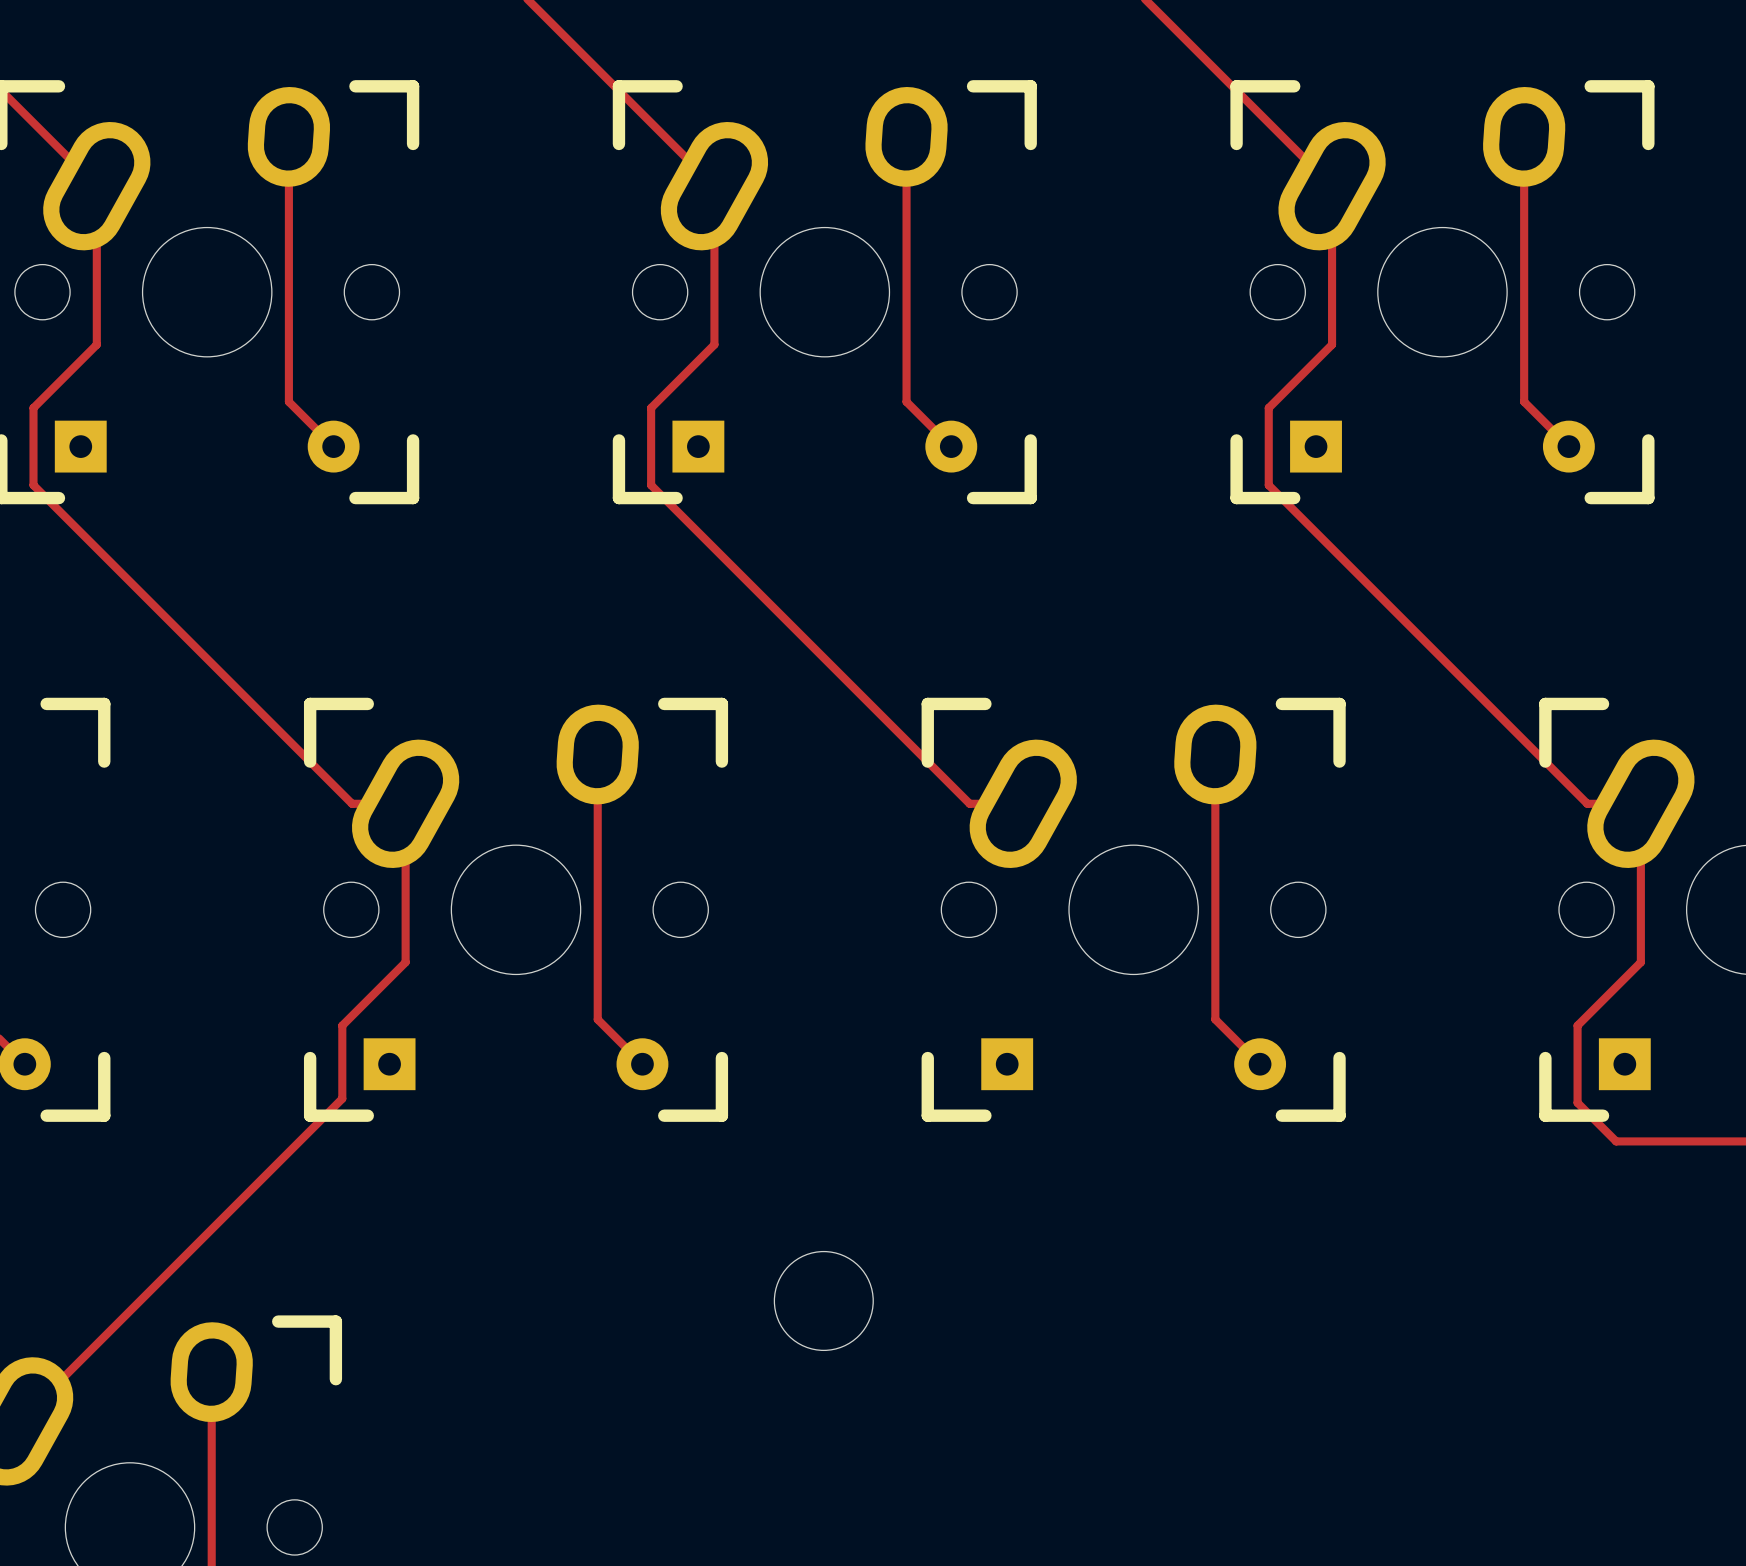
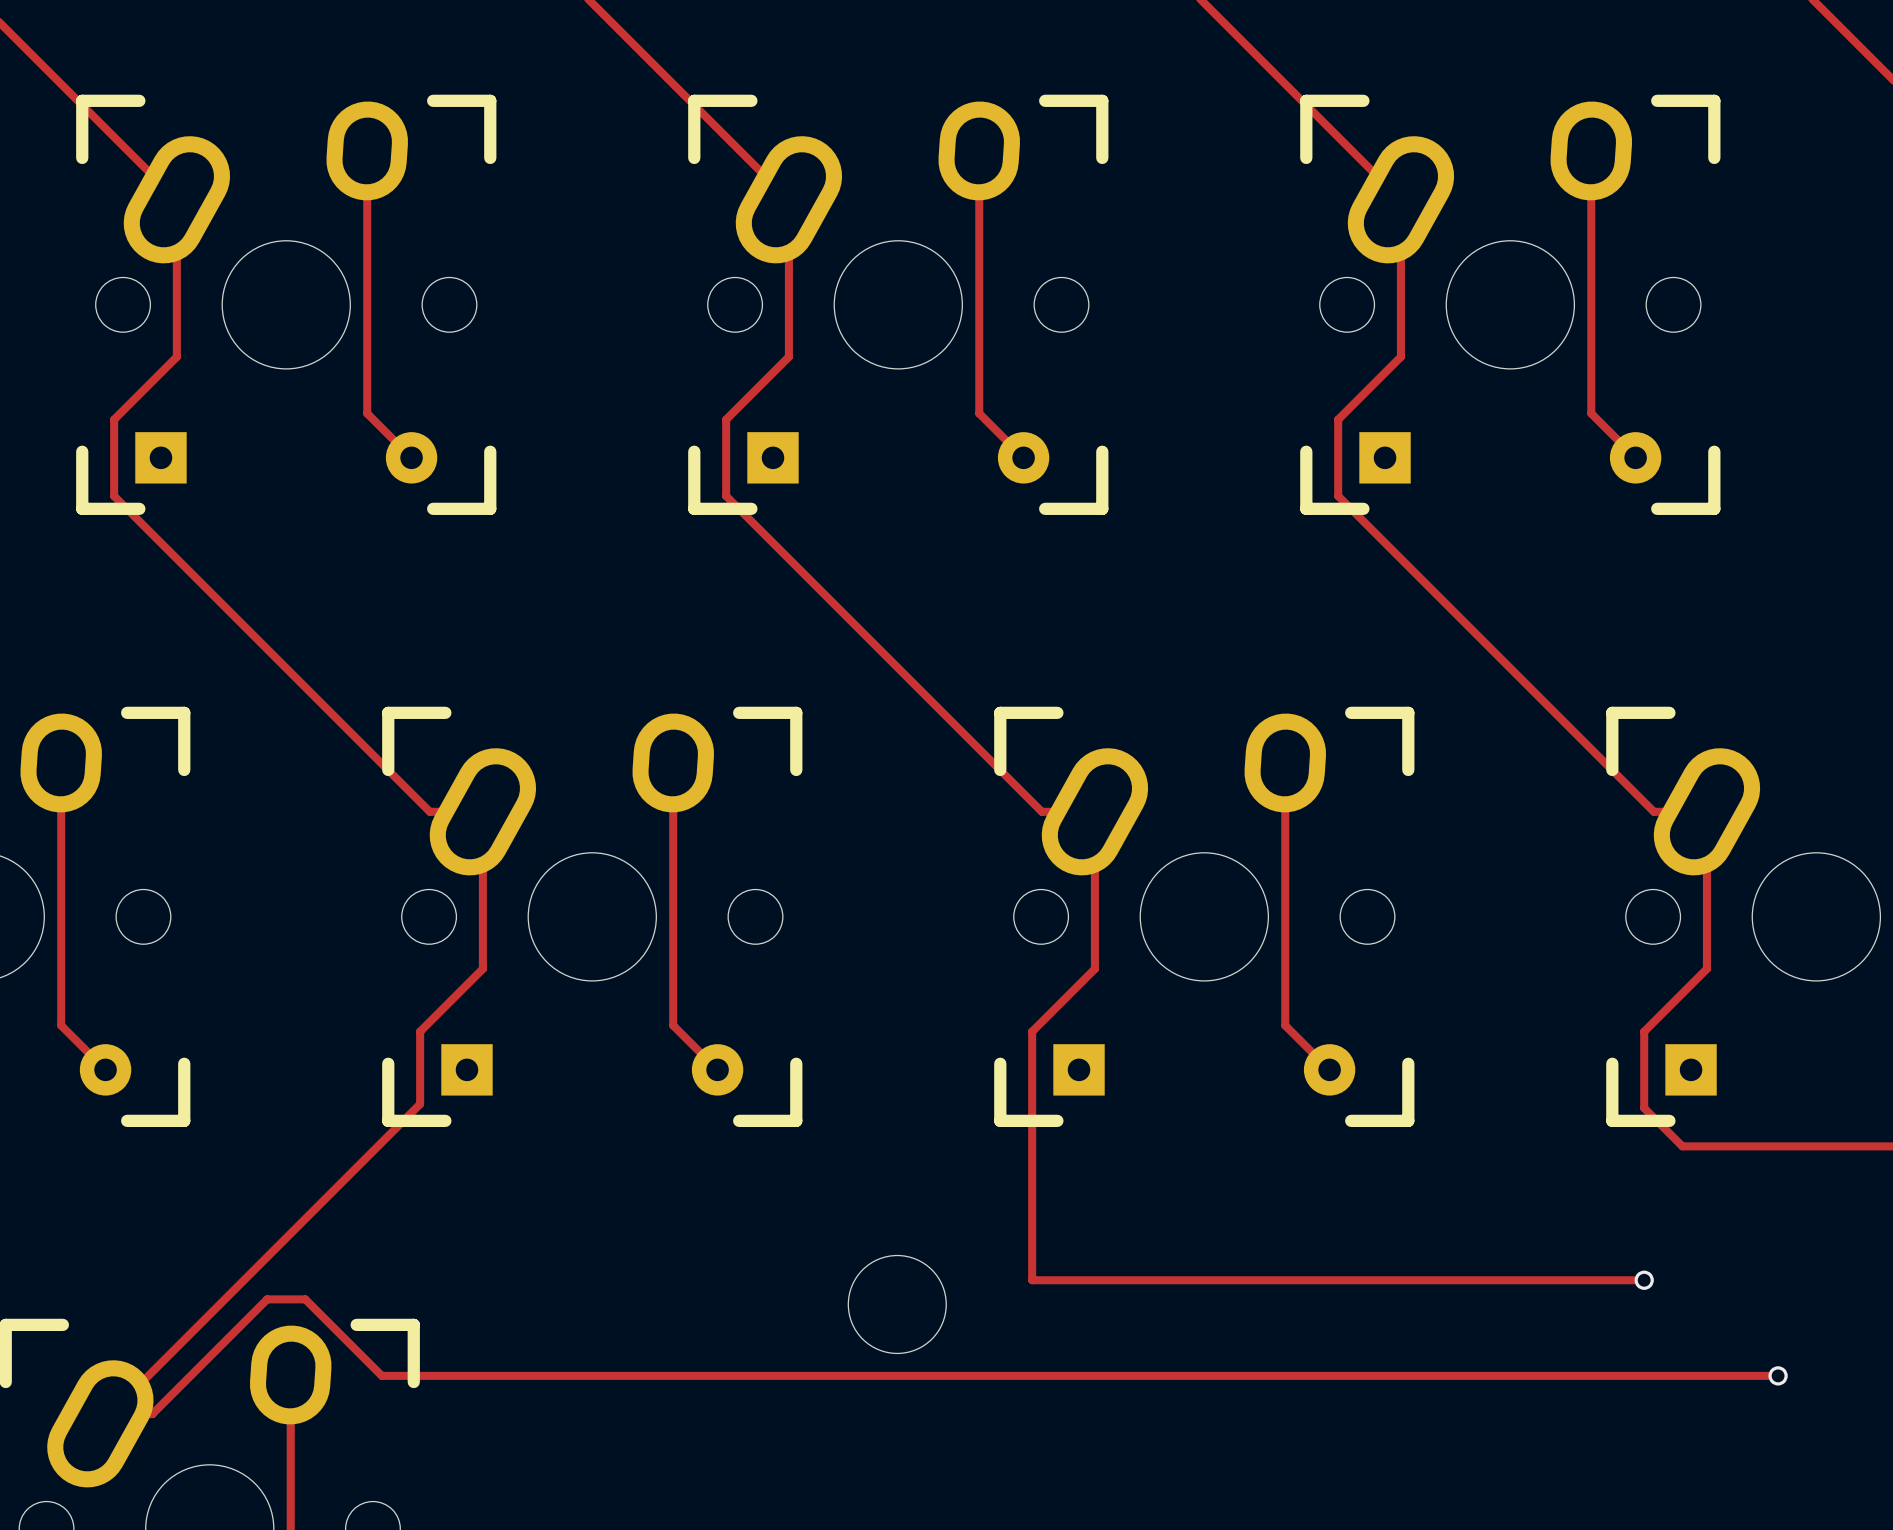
track: none -> (1094, 811) (1094, 968) (1032, 1031) (1032, 1280) (1644, 1280)
via: none -> (1644, 1280)
track: none -> (1778, 1375) (381, 1375) (305, 1299) (267, 1299) (152, 1414) (110, 1414)
via: none -> (1778, 1375)

